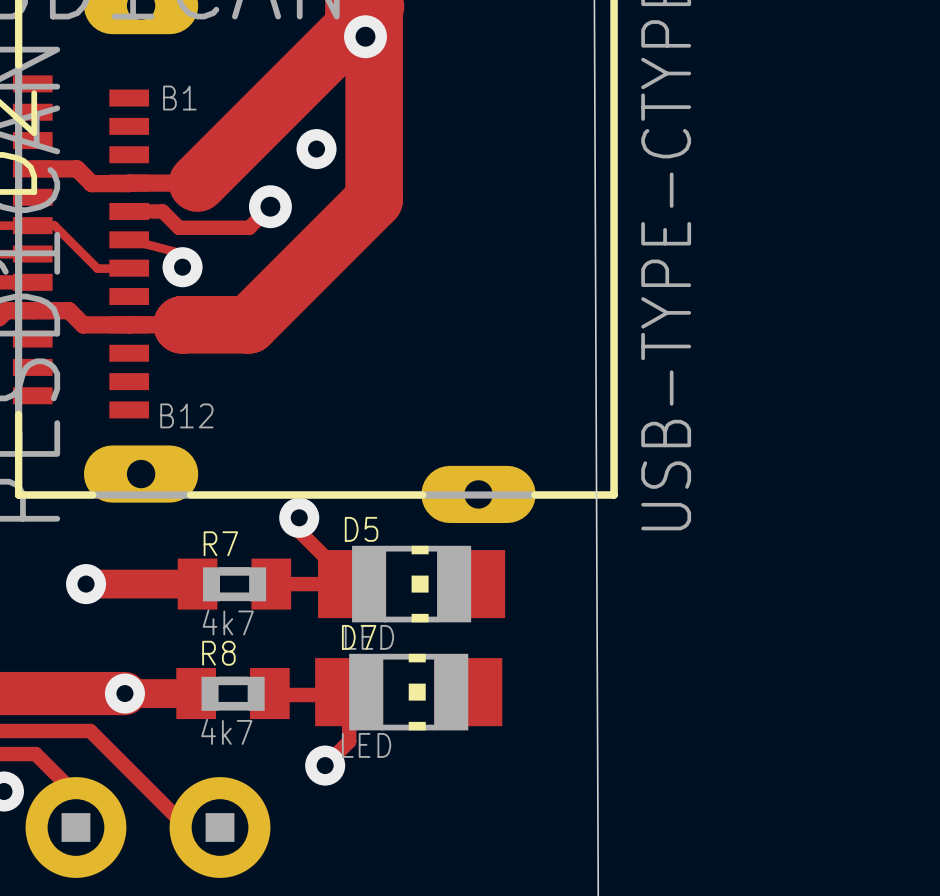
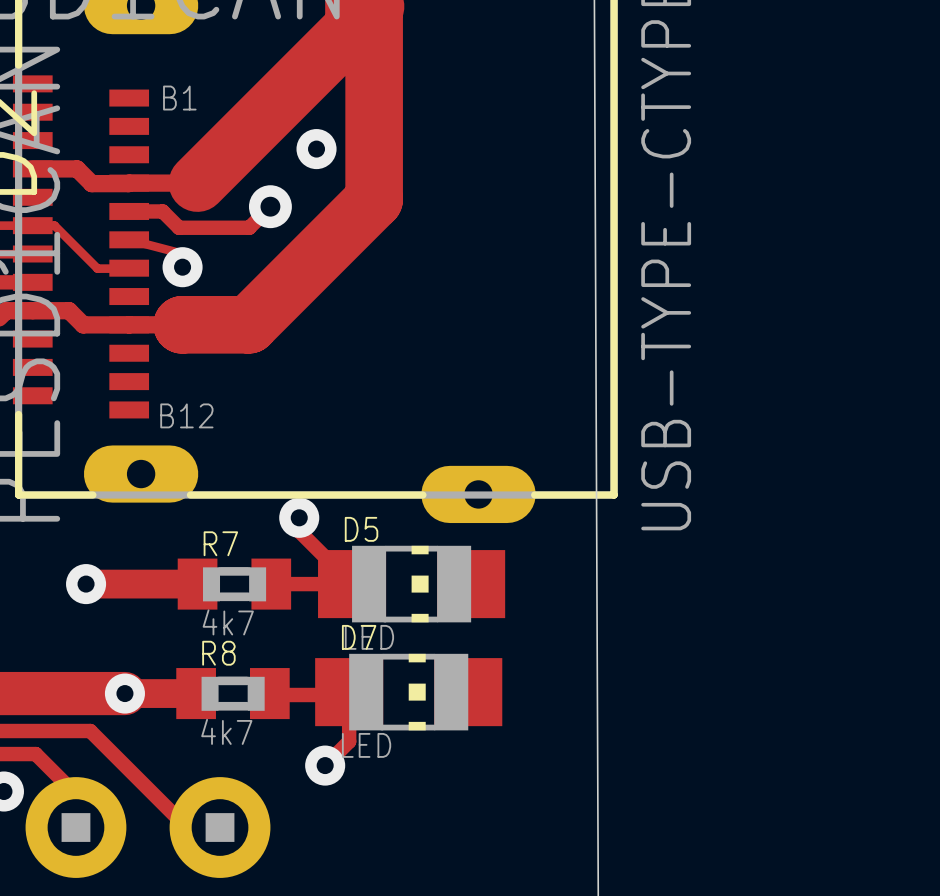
via: (365, 36) -> none

